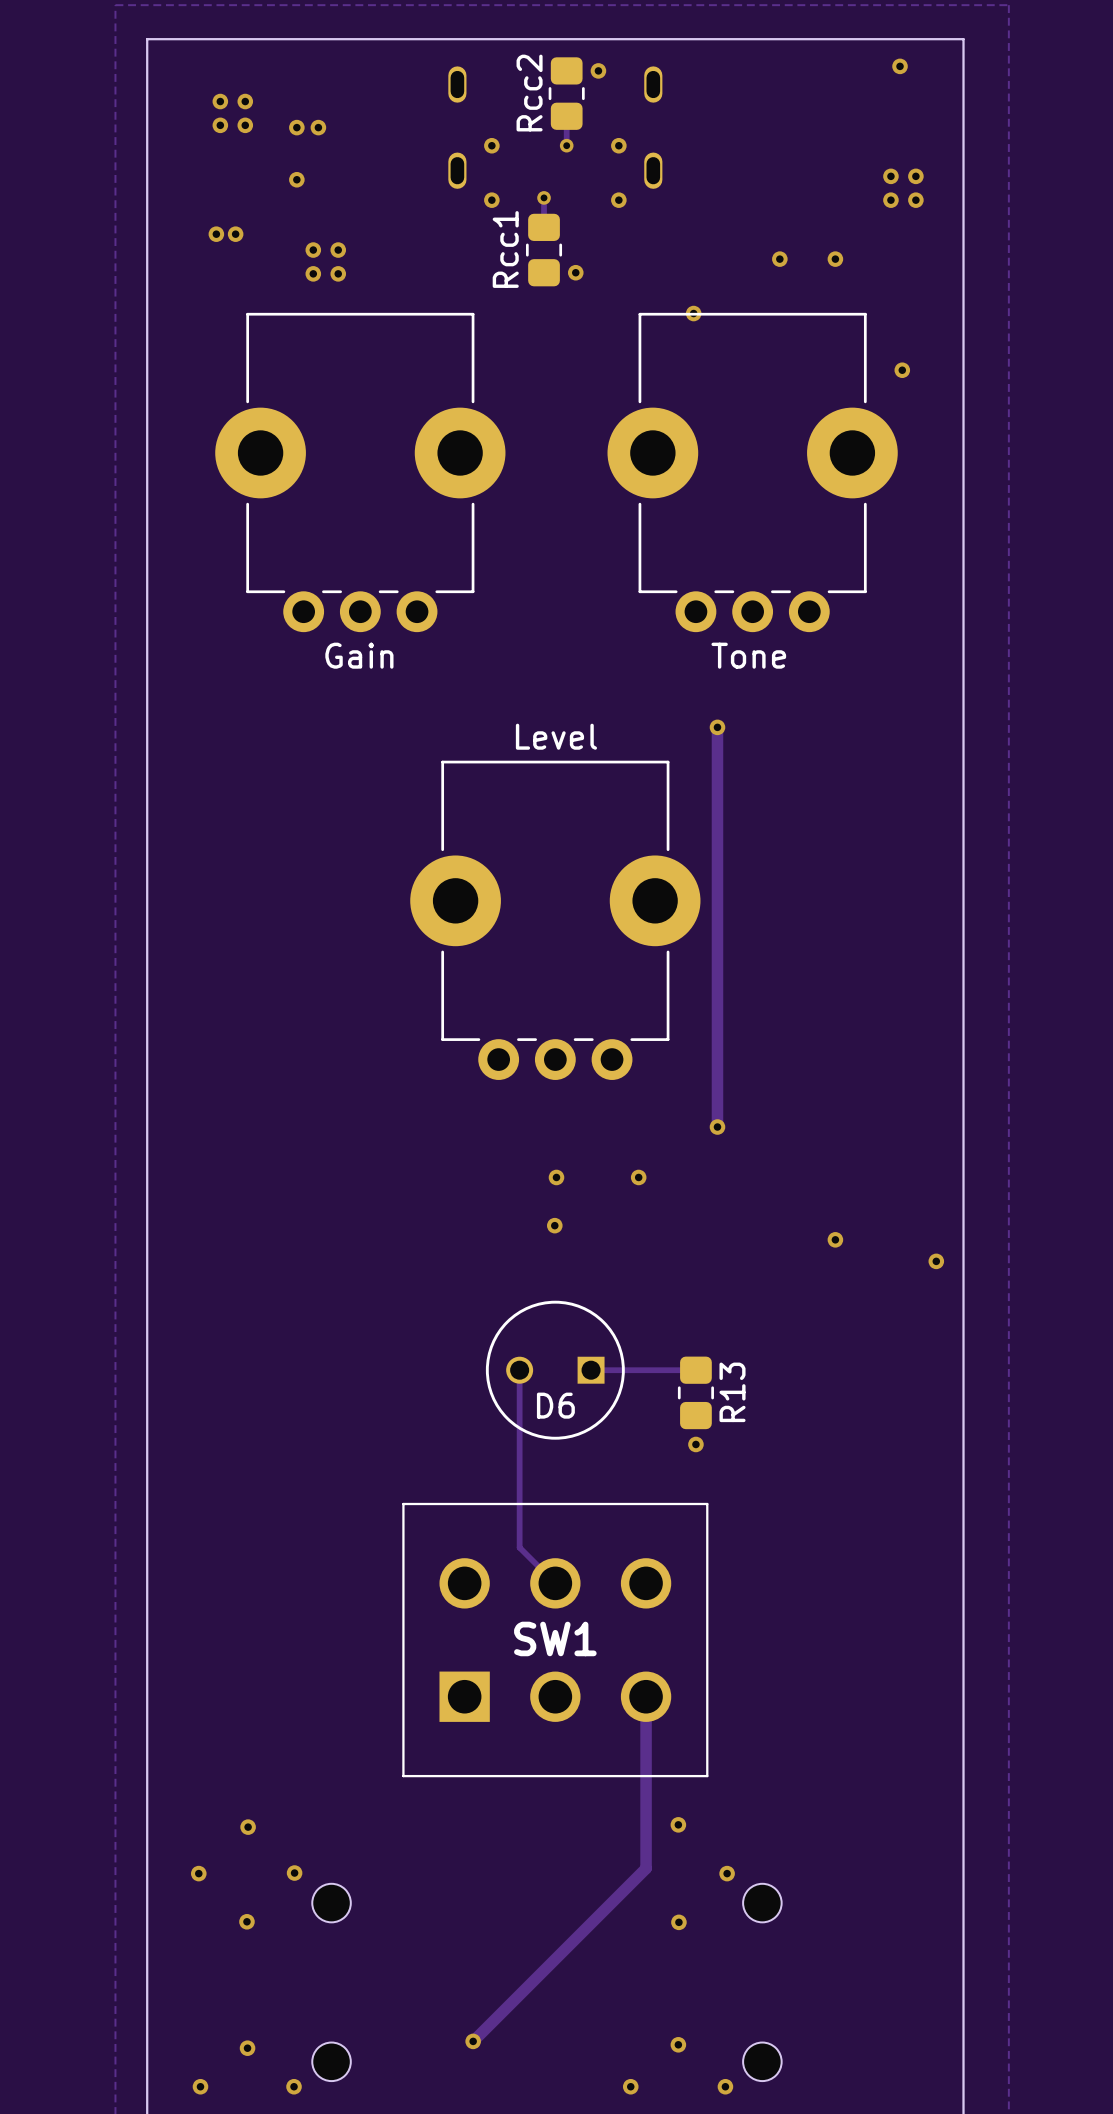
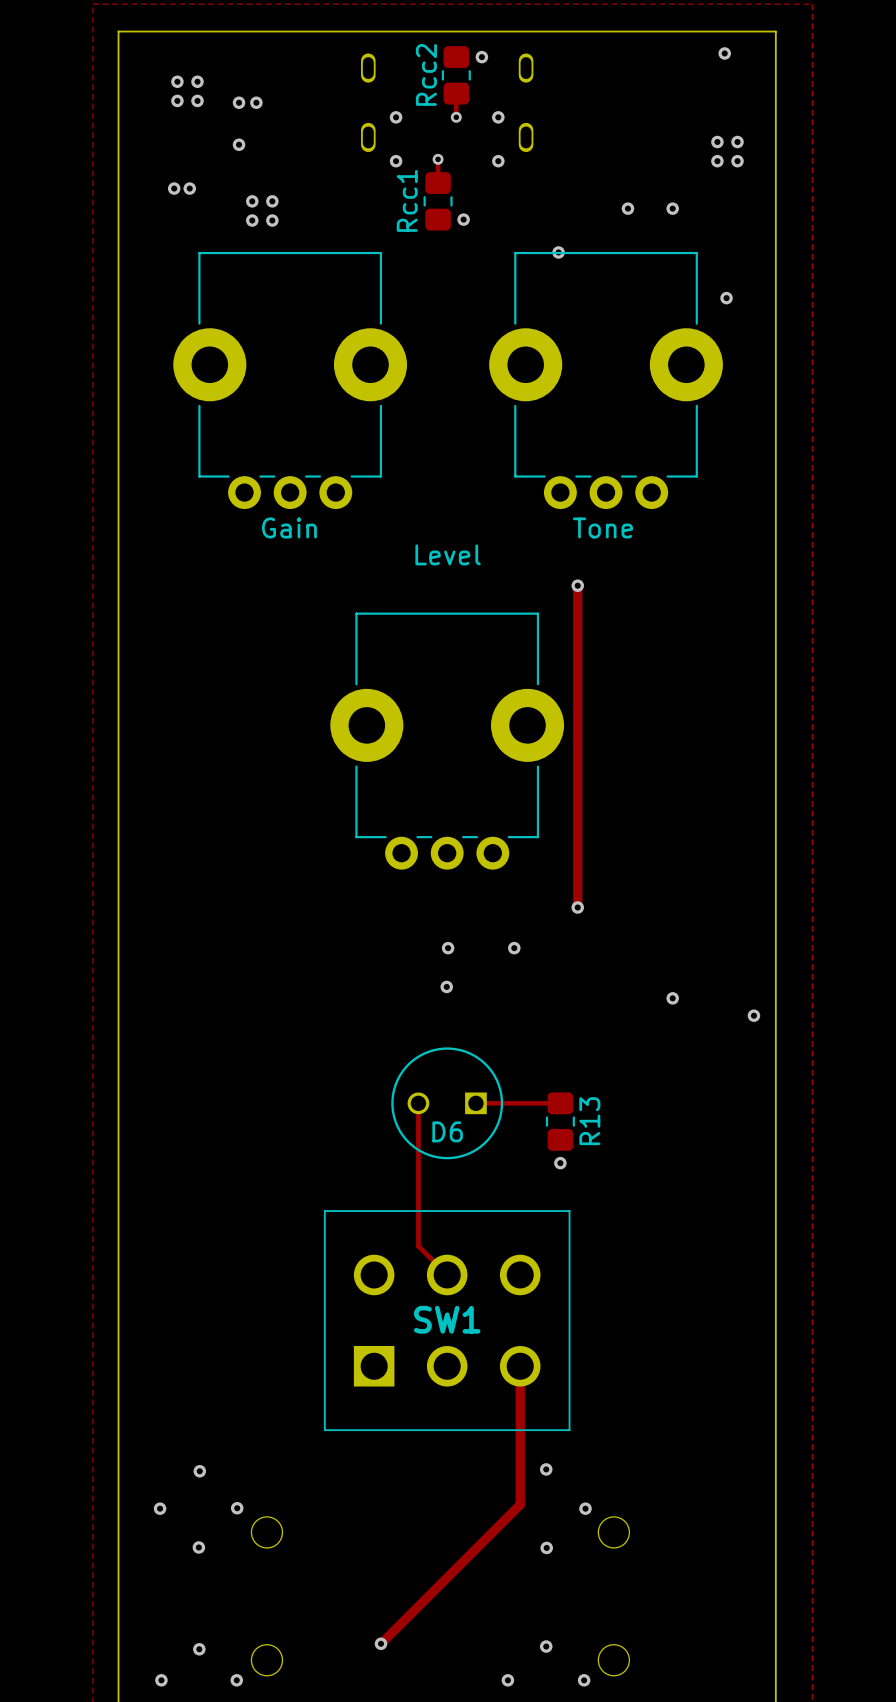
text position: Level (556, 736) -> Level (448, 554)

